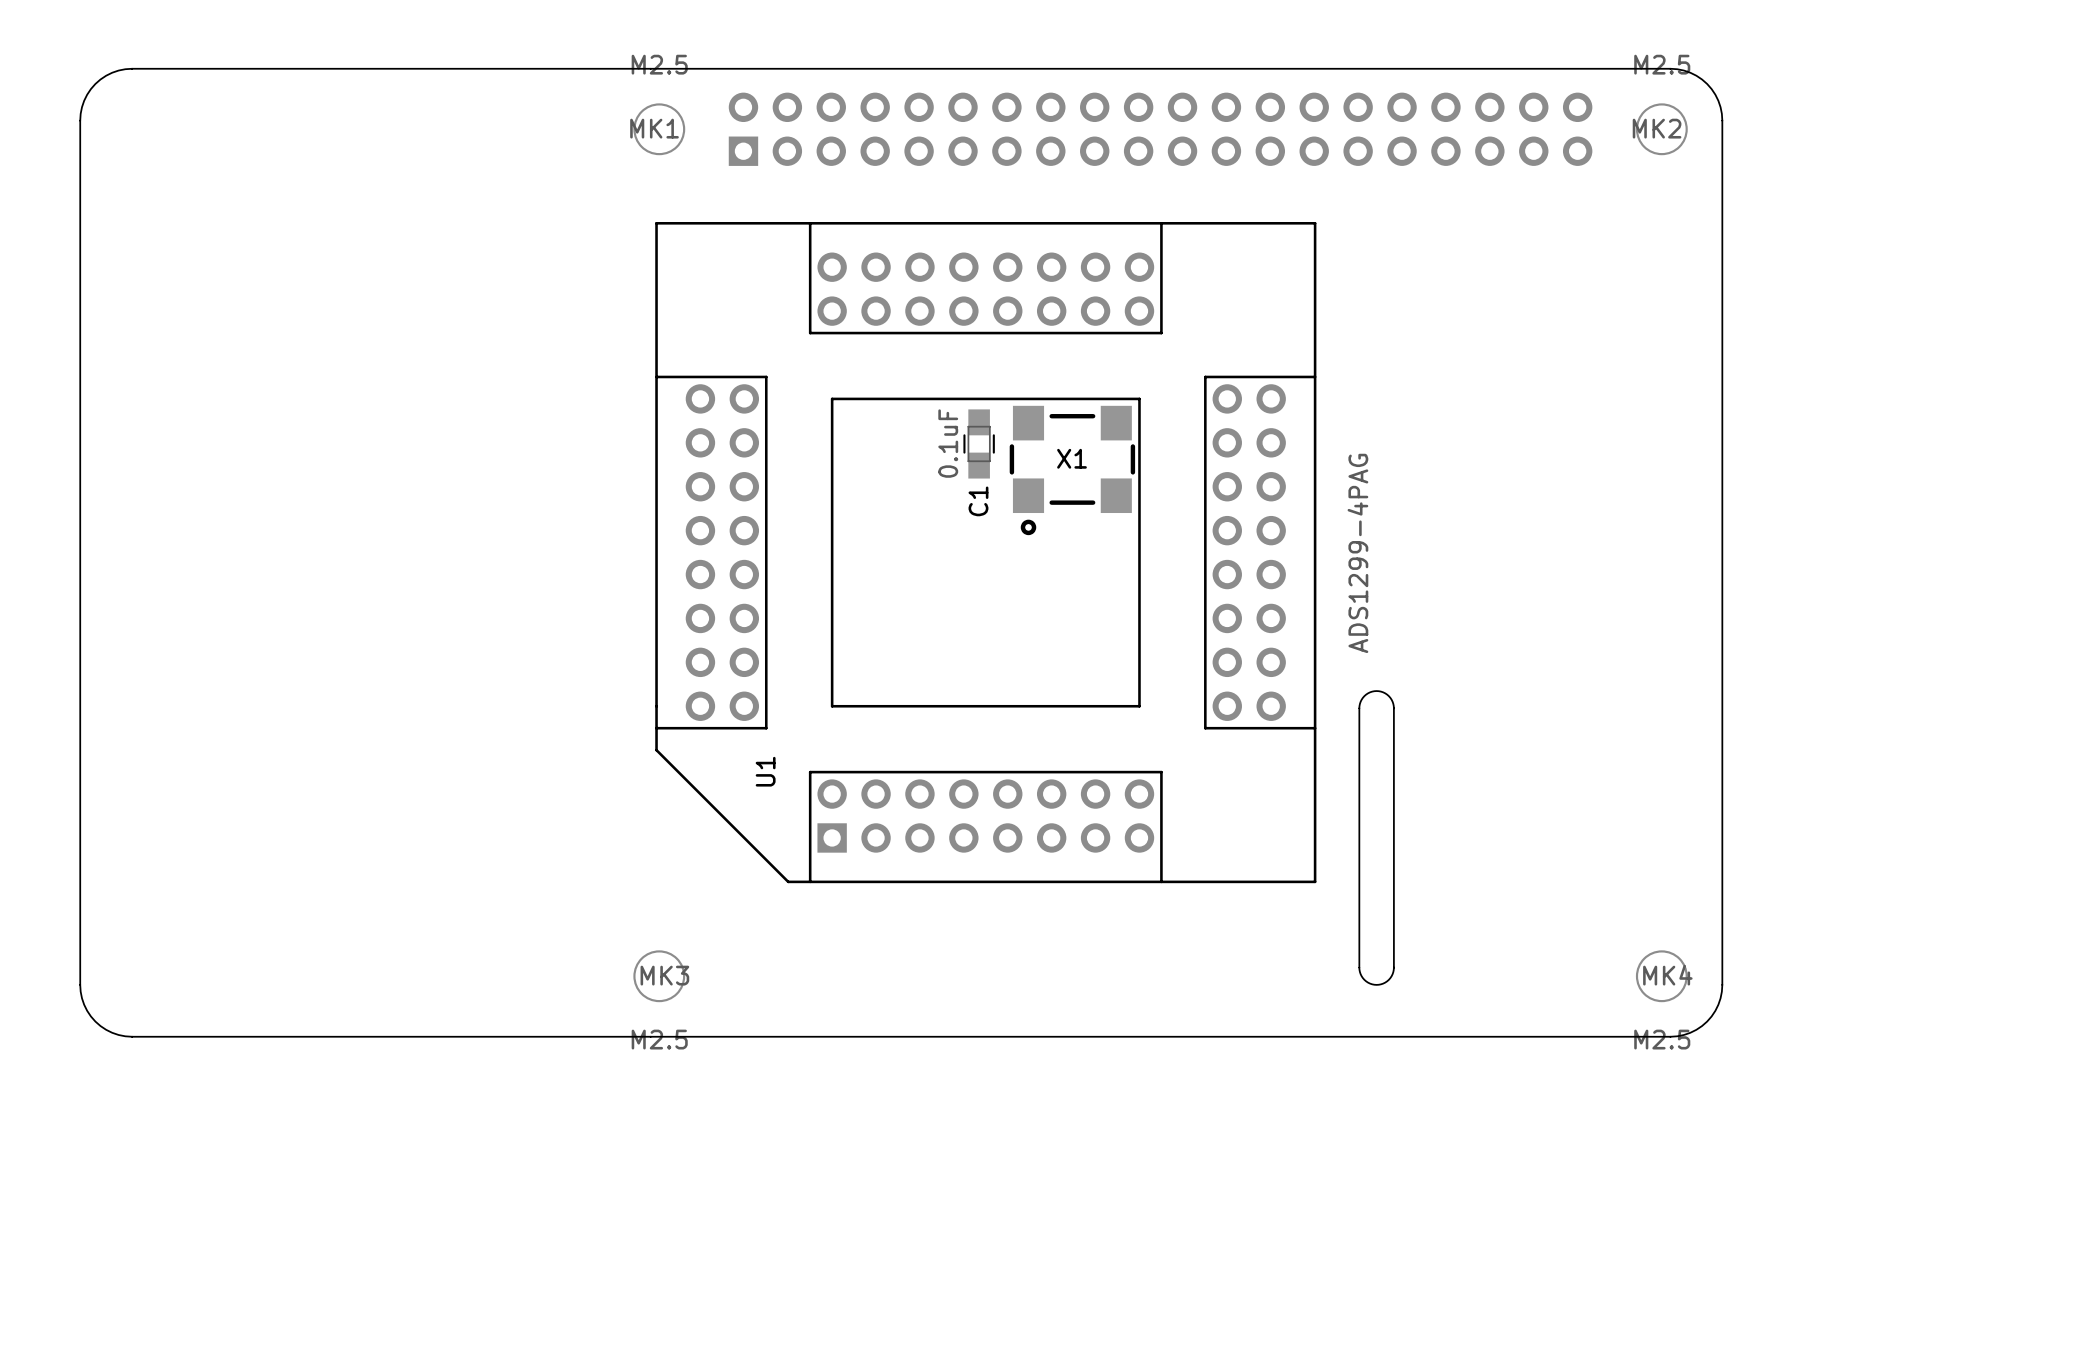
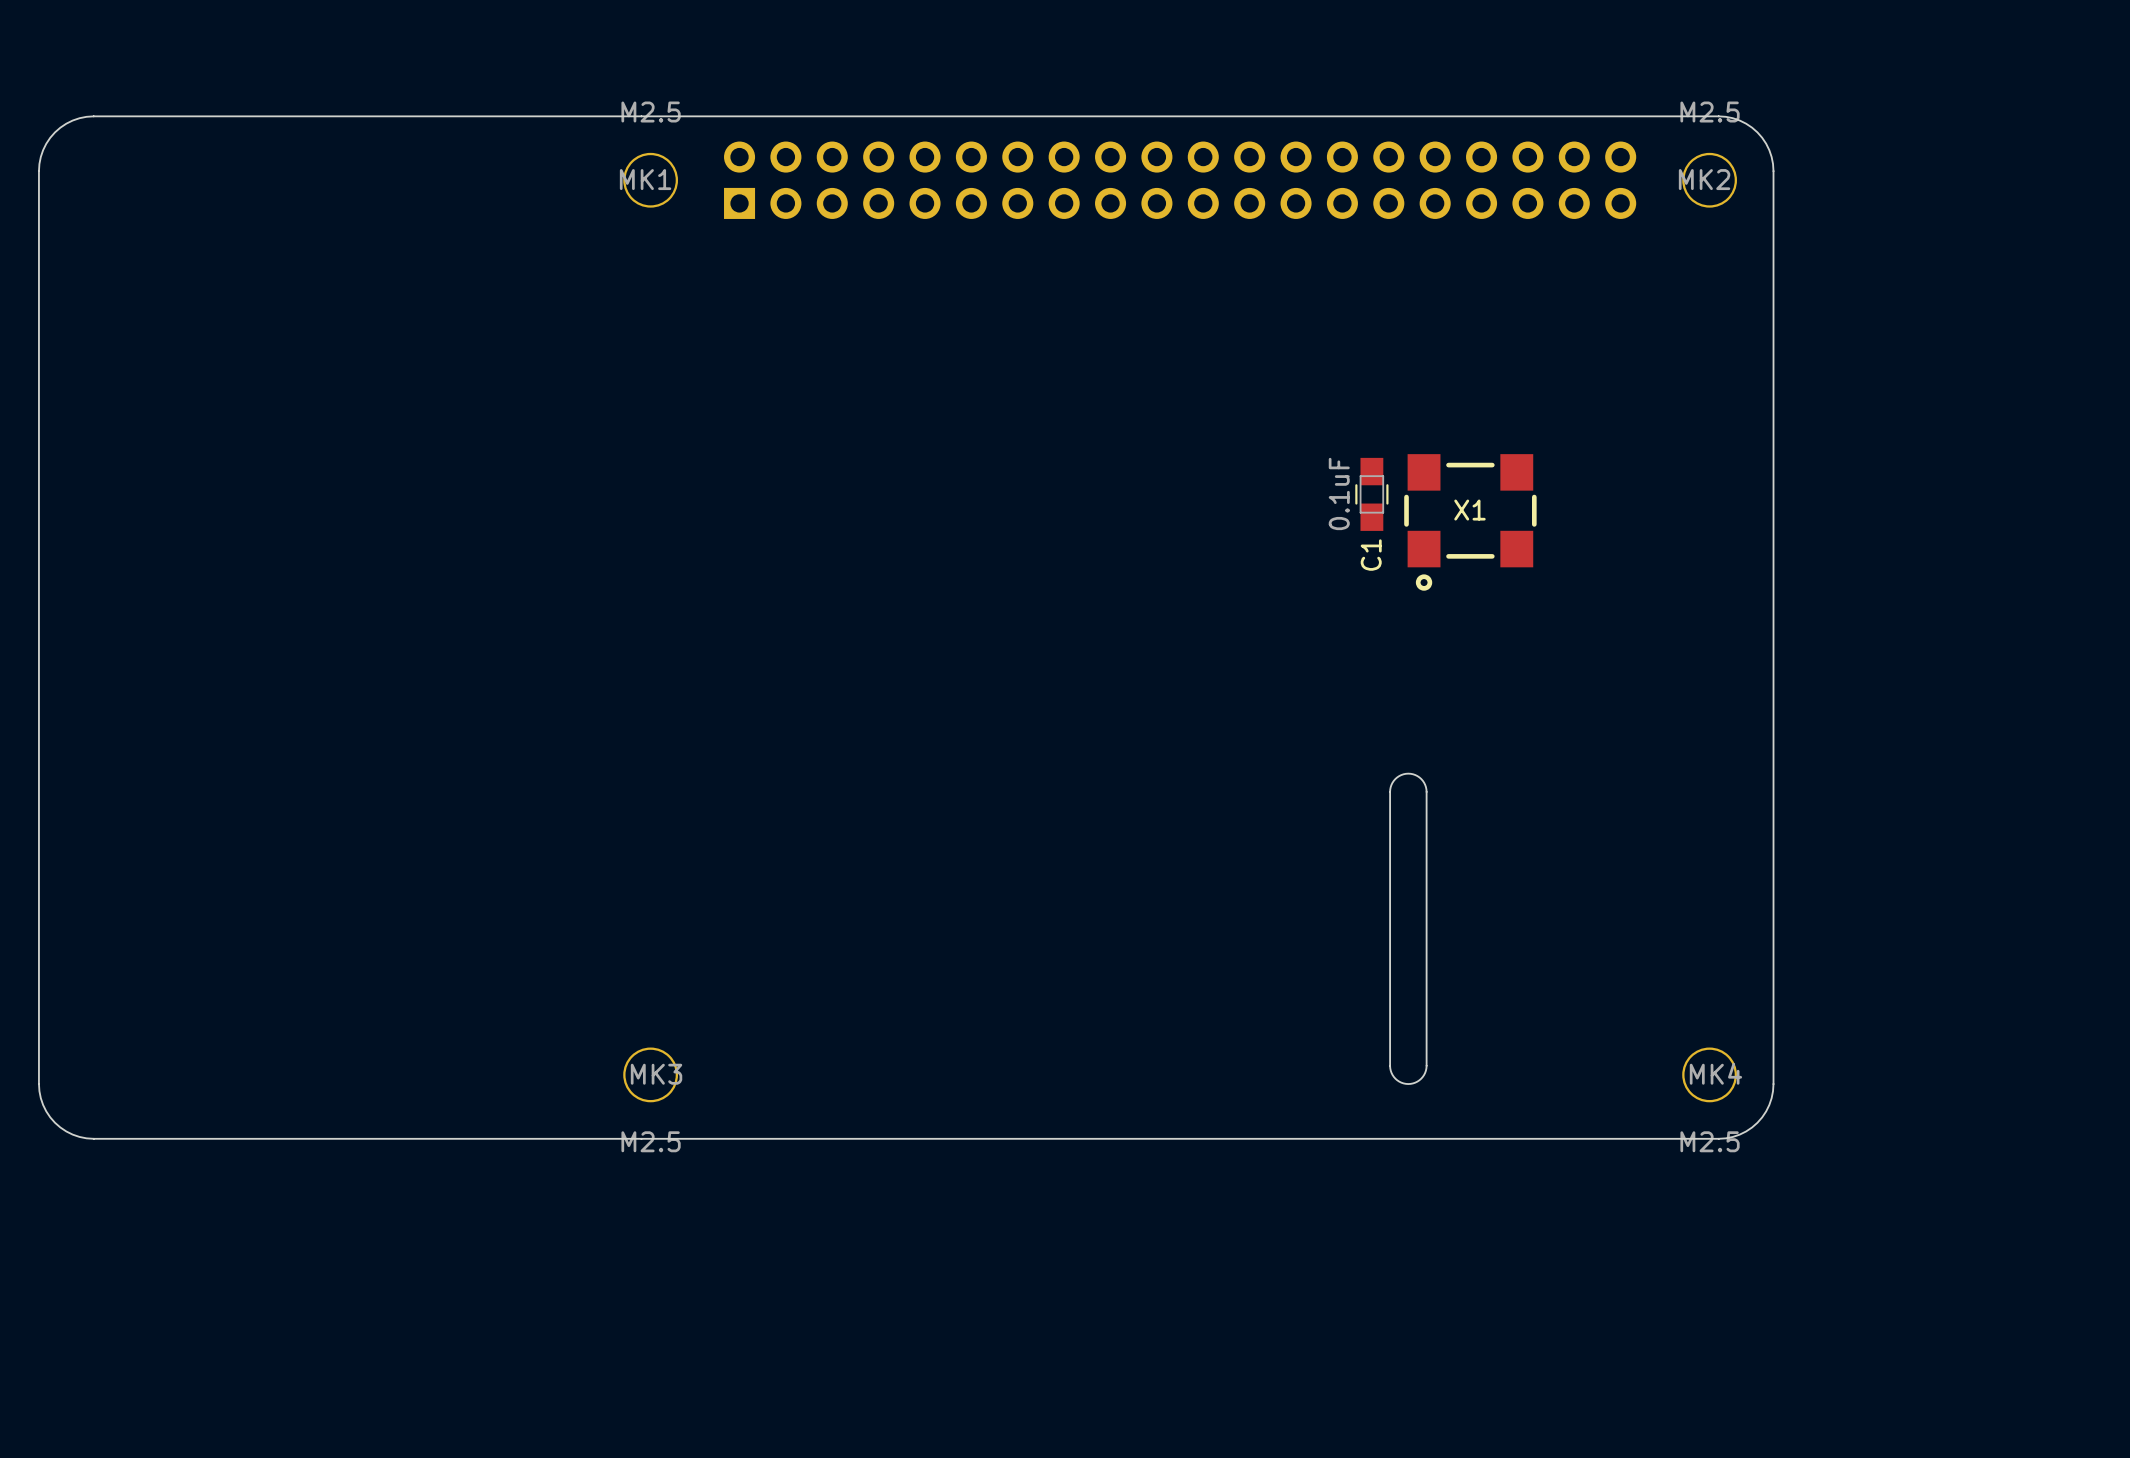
C1 position: (979, 443) -> (1371, 494)
X1 position: (1072, 470) -> (1470, 522)
U1: ADS1299-4PAG (985, 552) -> none

